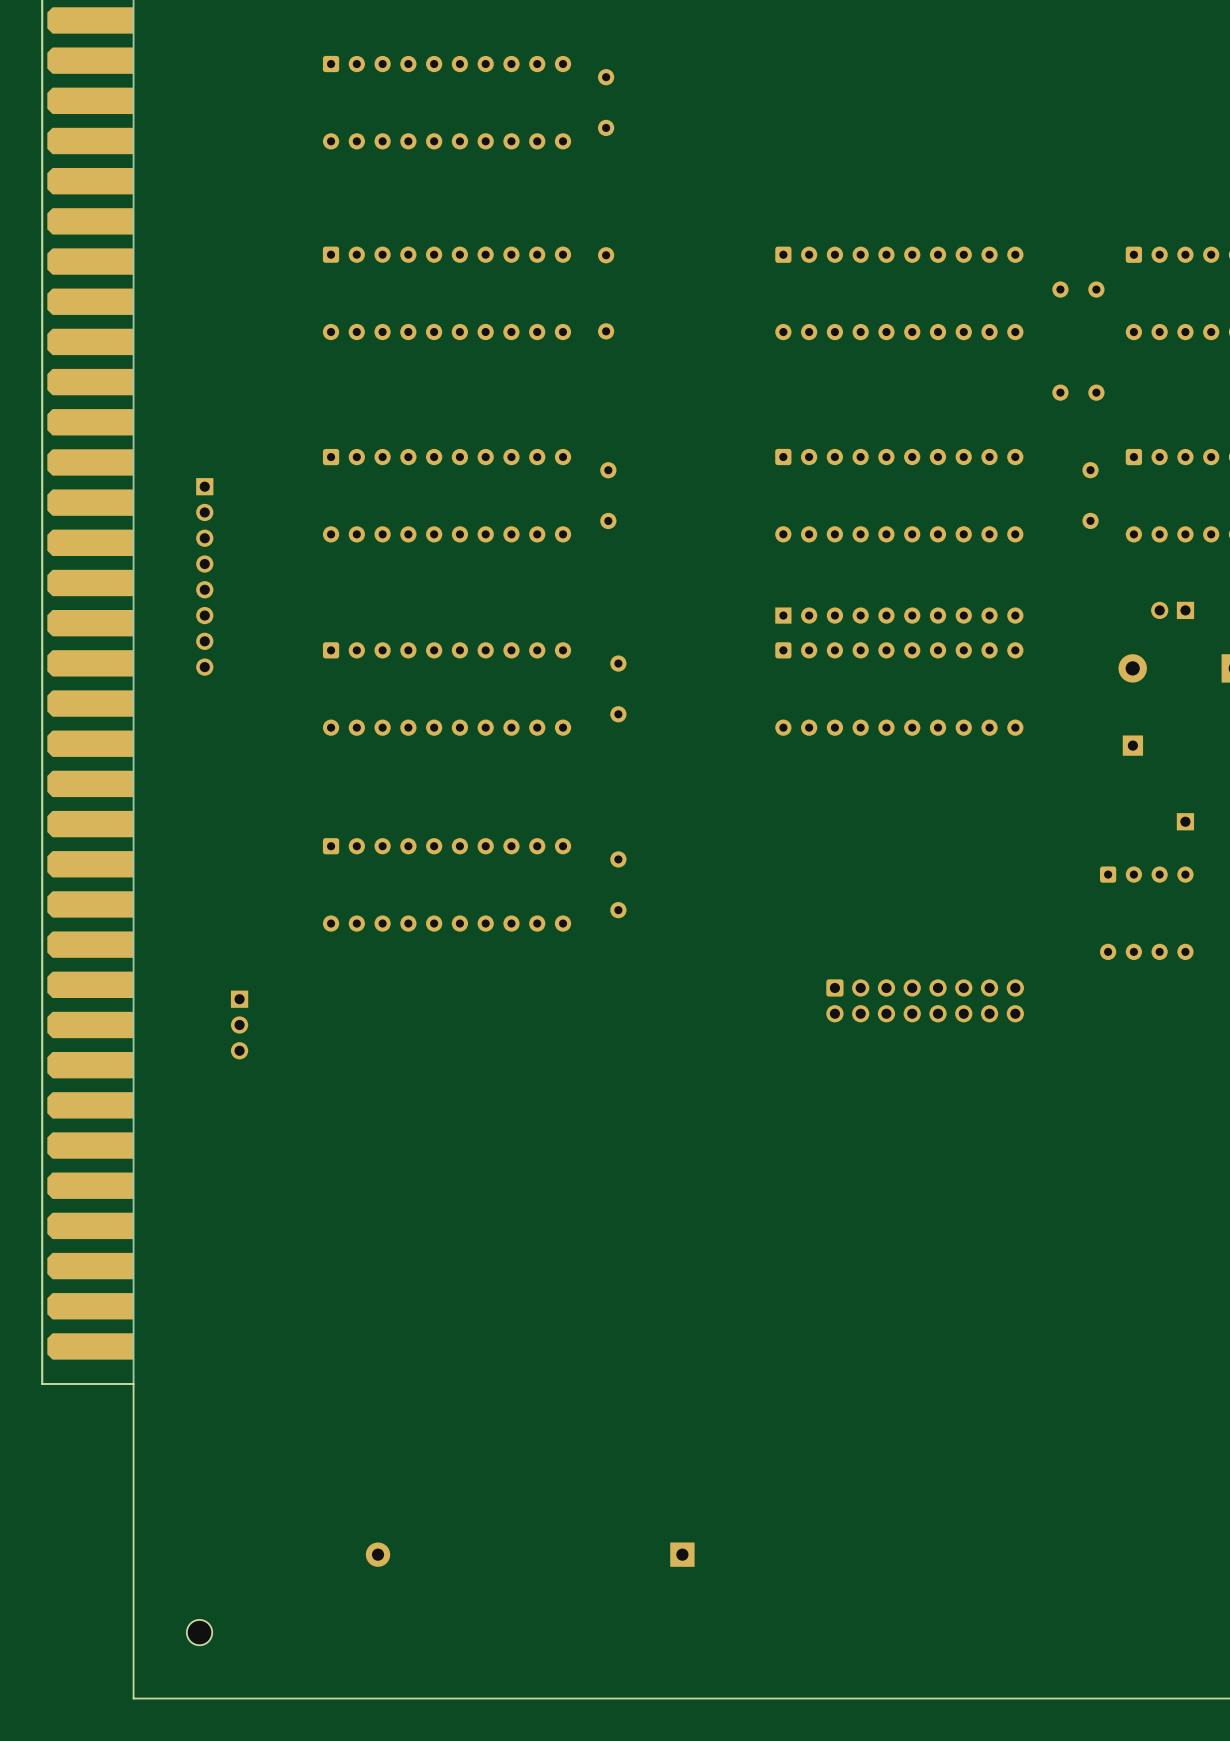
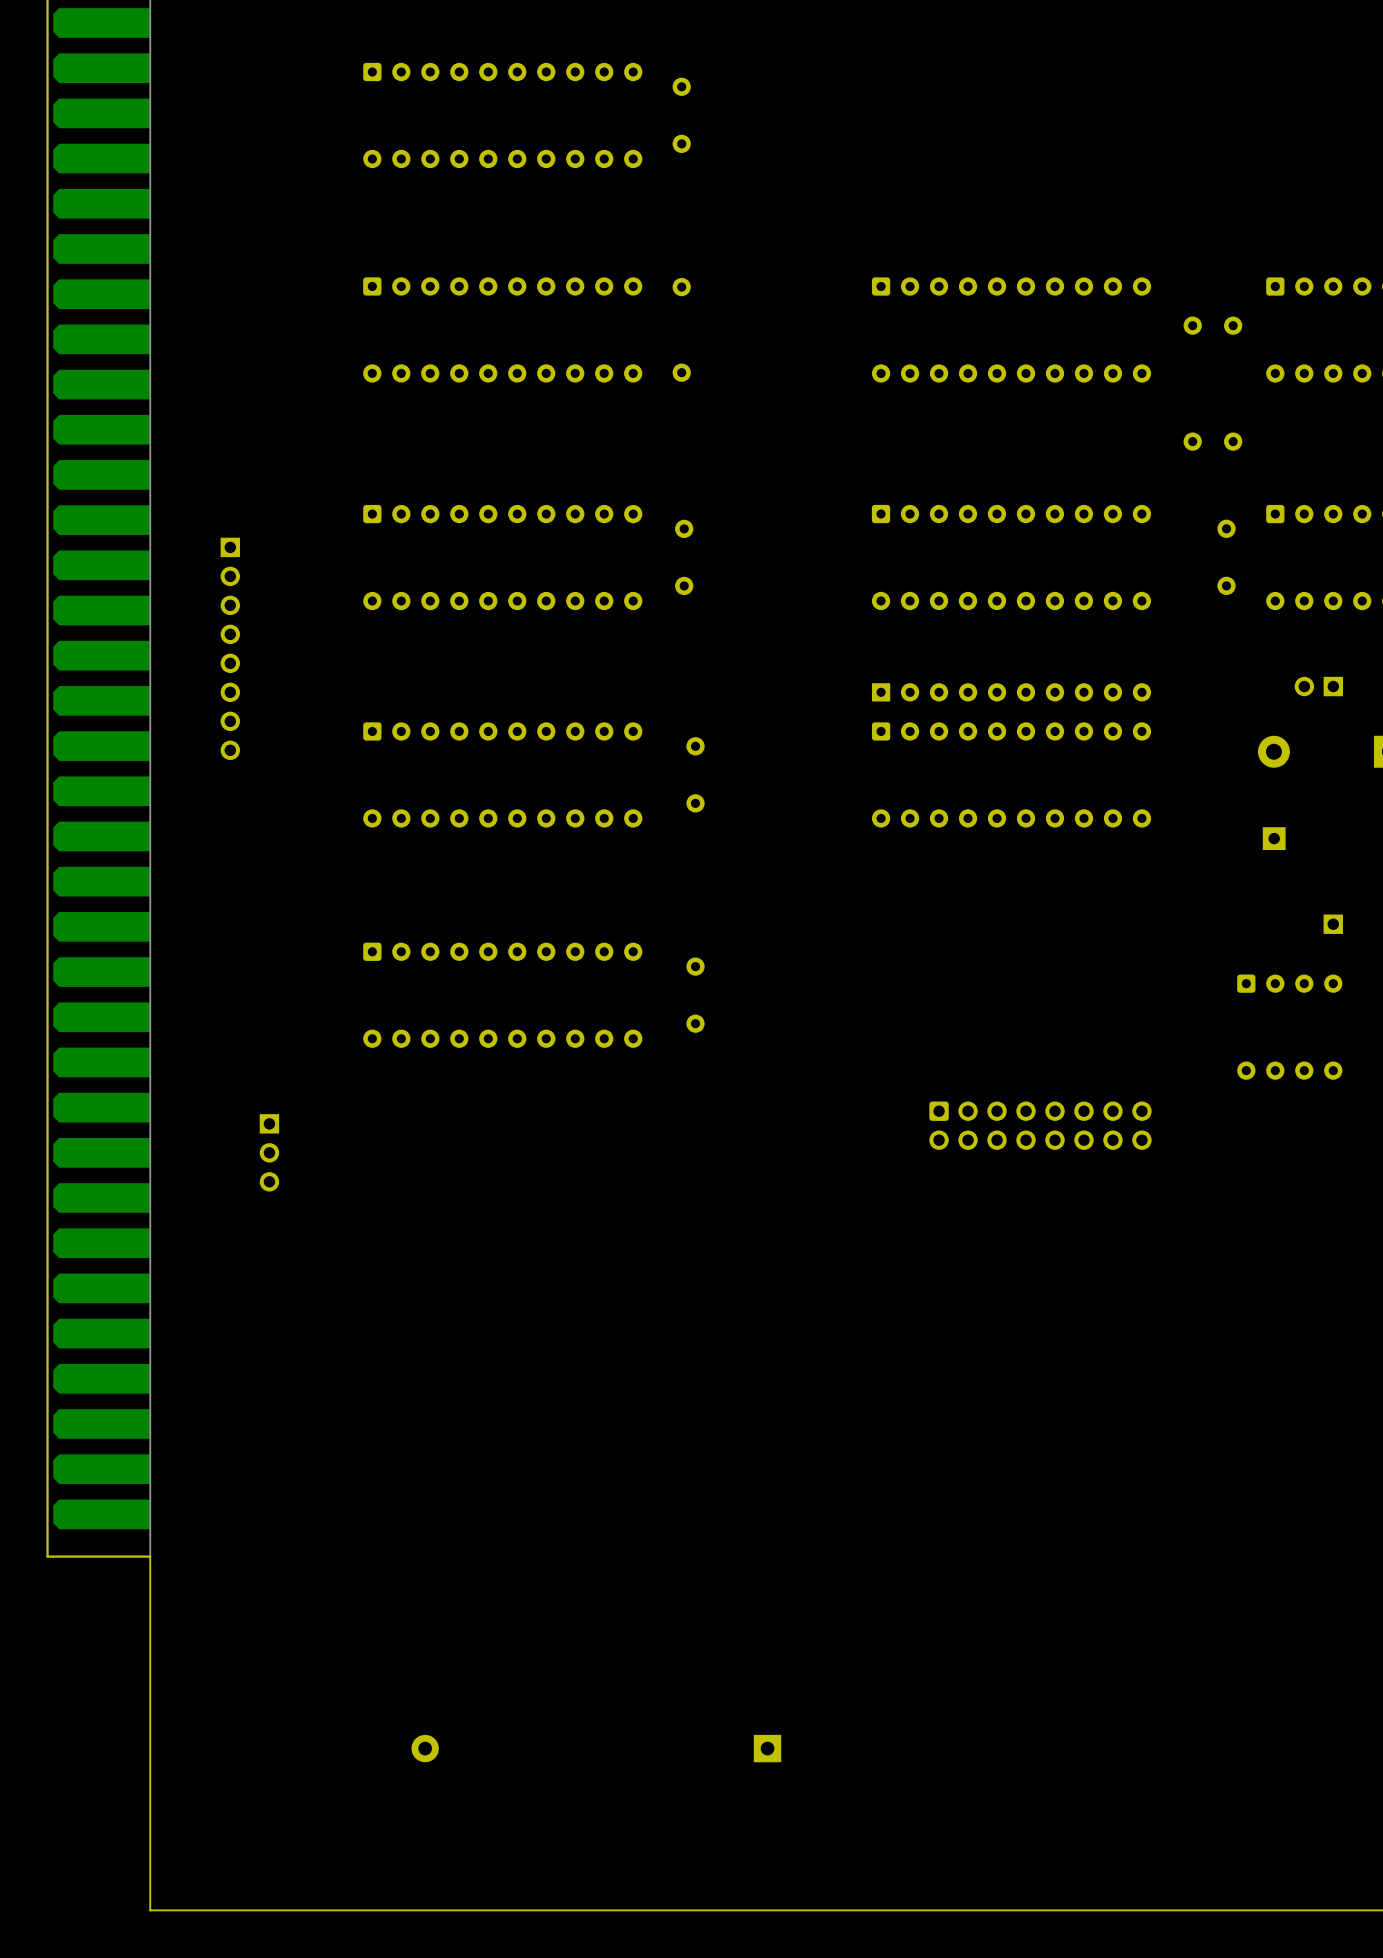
part: (199, 1632) -> none

